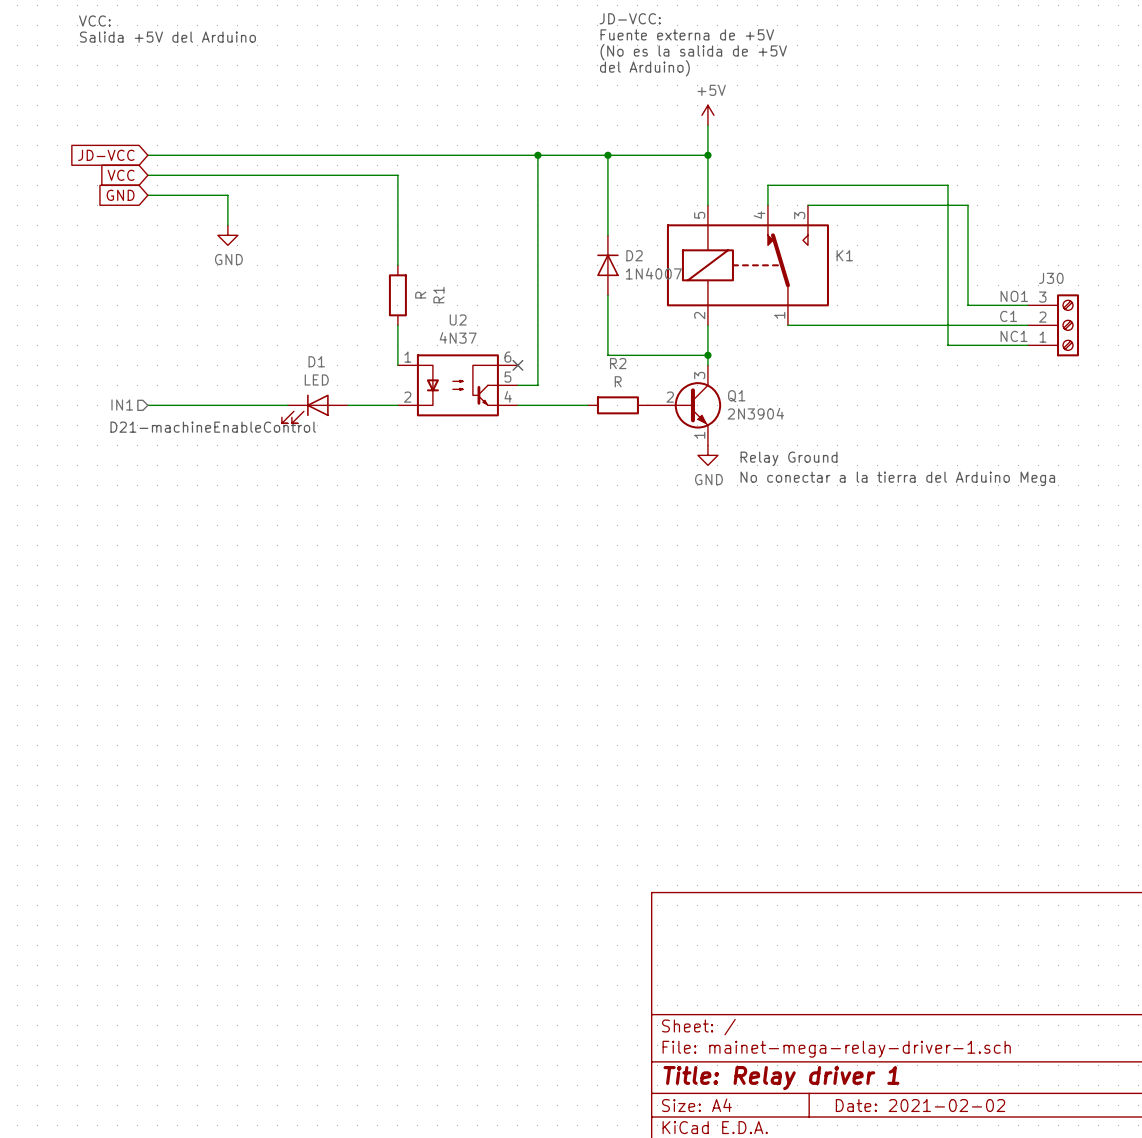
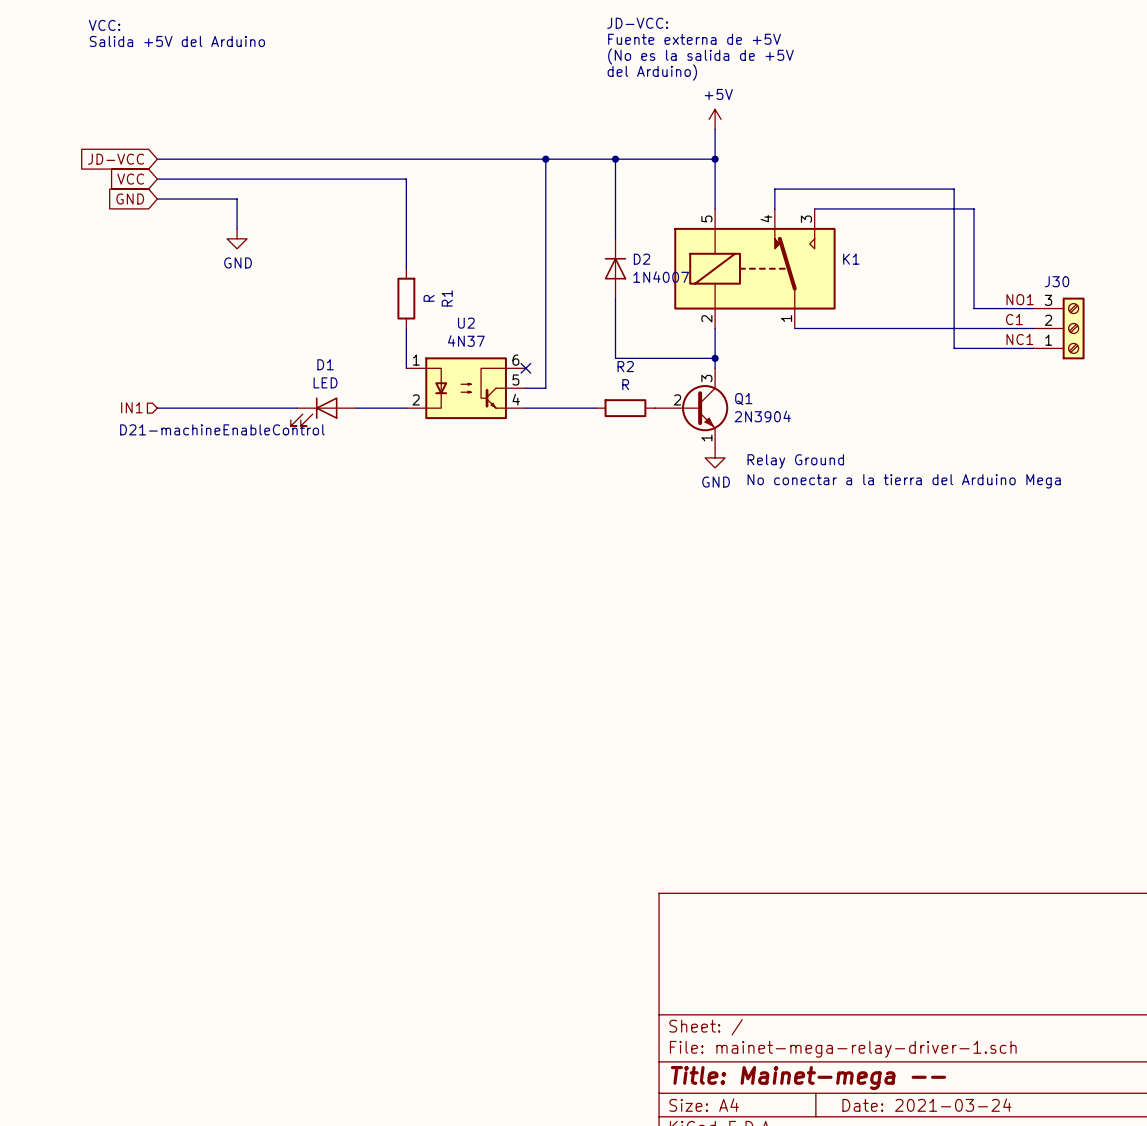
title block: Title: Relay driver 1 (781, 1078) -> Title: Mainet-mega -- (808, 1078)
title block: Date: 2021-02-02 (920, 1105) -> Date: 2021-03-24 (927, 1105)

